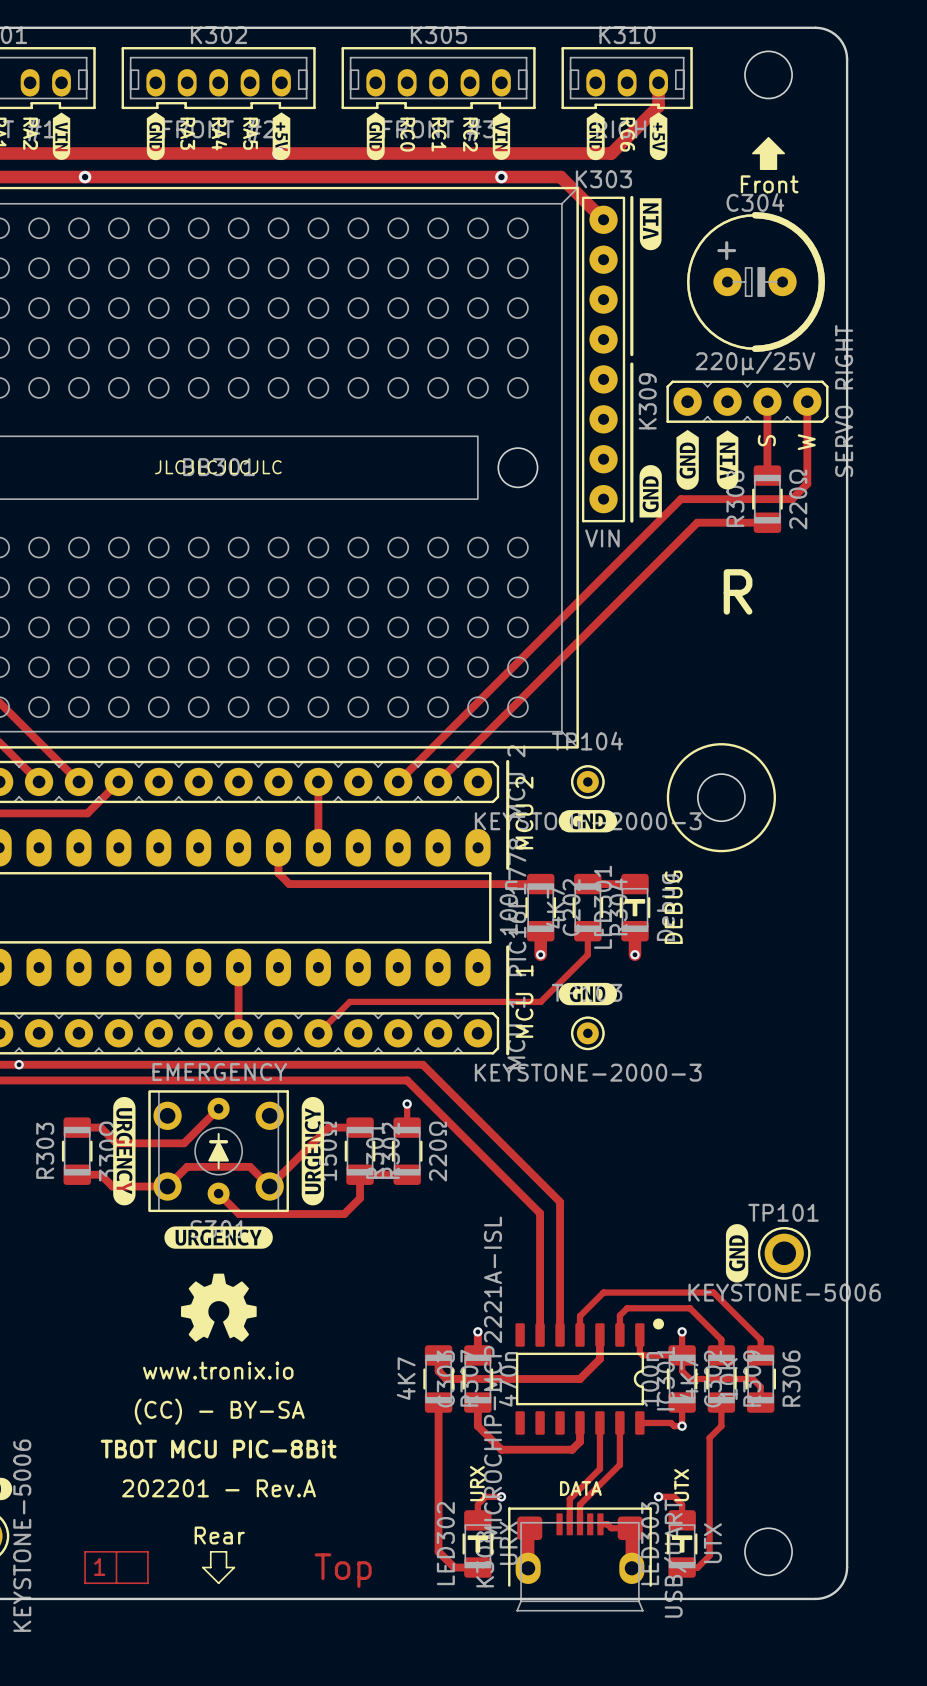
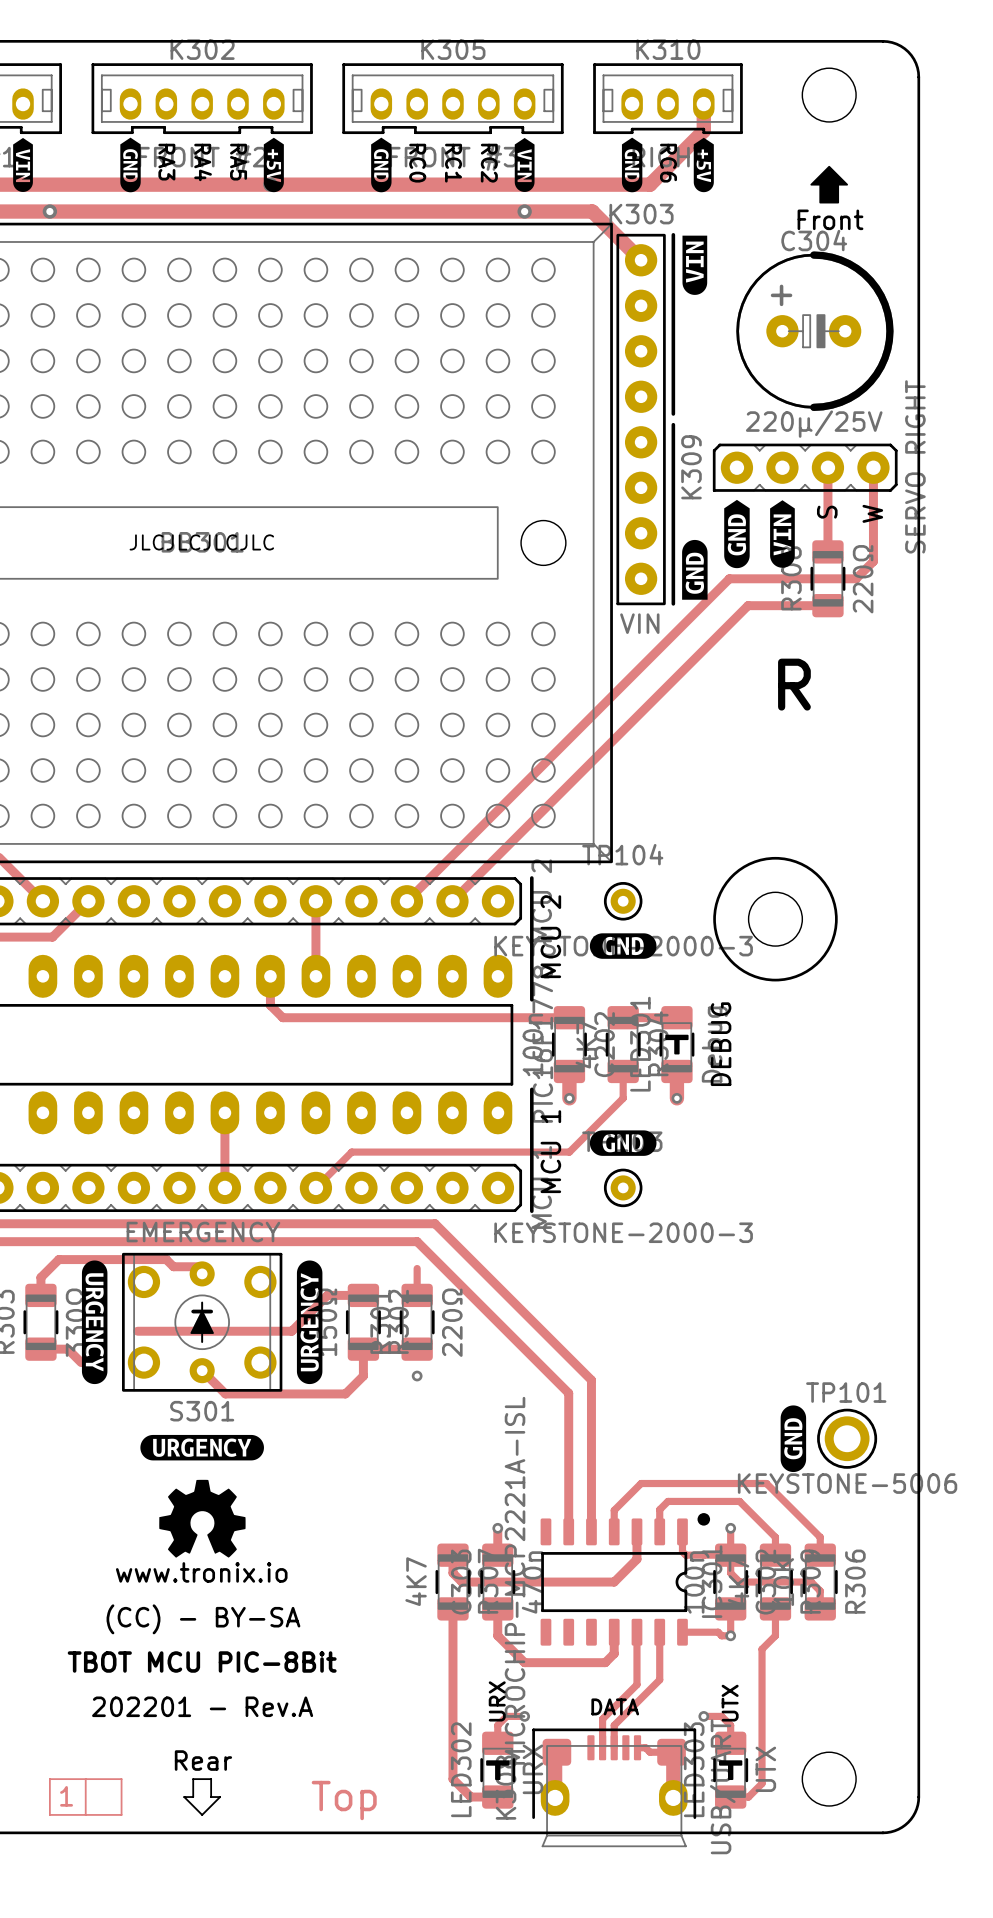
via position: (407, 1104) -> (417, 1376)
track: (218, 1108) (184, 1143) (116, 1143) (100, 1127) (77, 1127) -> (202, 1266) (173, 1266) (166, 1259) (58, 1259) (40, 1277) (40, 1295)
track: (297, 1159) (269, 1186) (250, 1166) (187, 1166) (167, 1186) (112, 1186) -> (291, 1331) (137, 1331)
drawing position: (218, 1237) -> (202, 1447)
drawing position: (218, 1307) -> (202, 1518)

